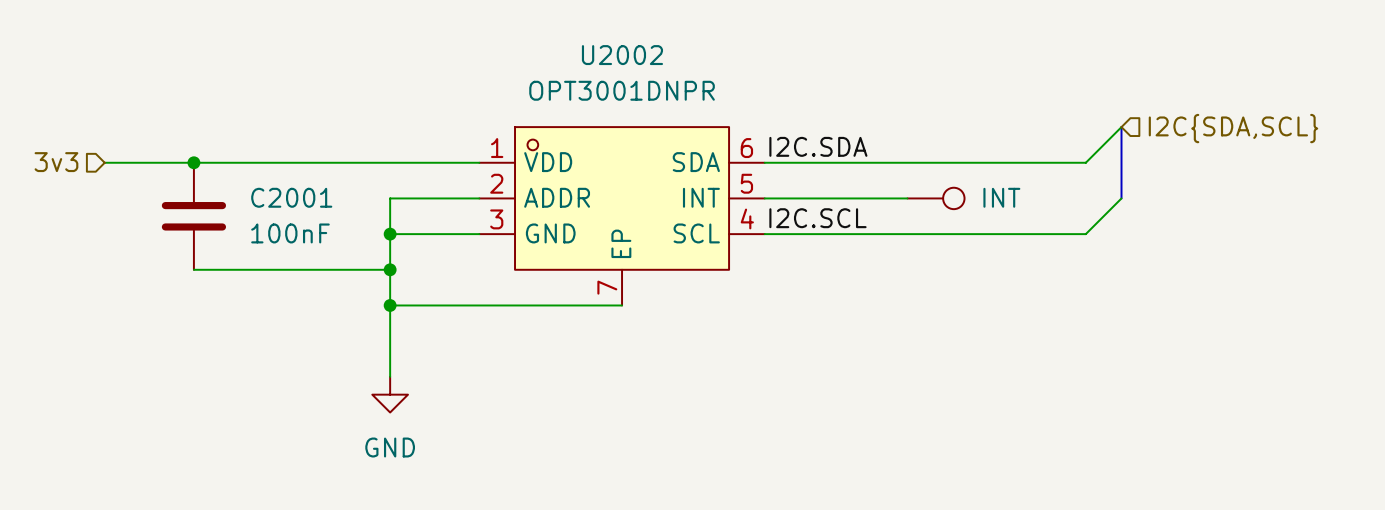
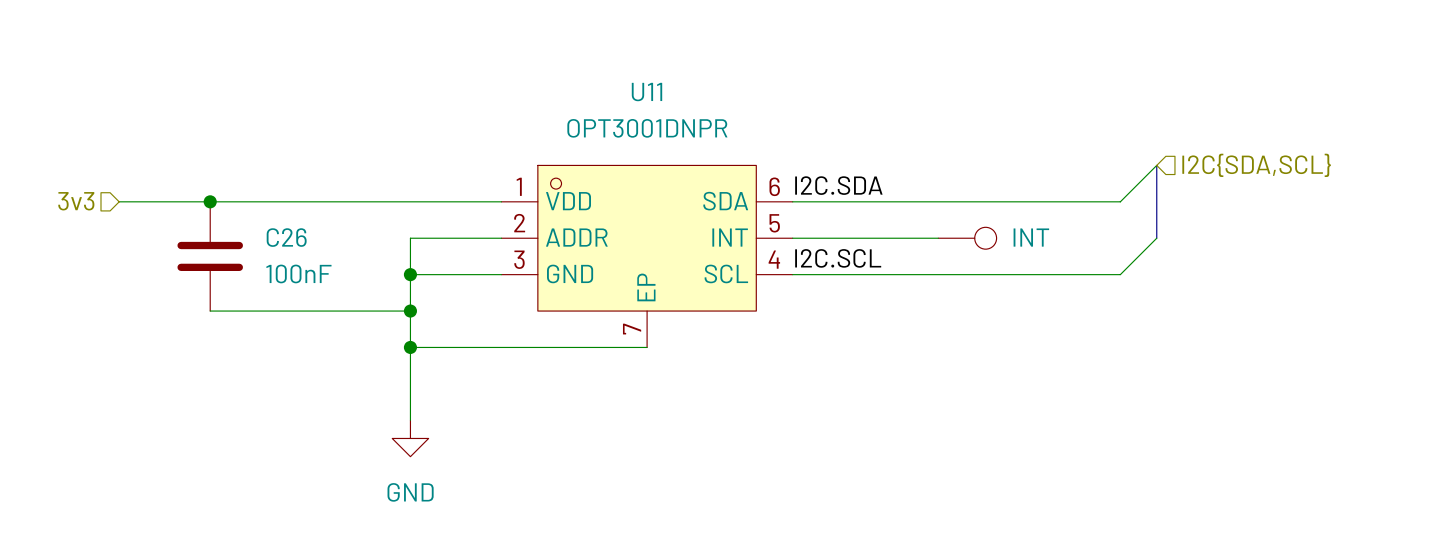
U2002 name: U2002 (622, 55) -> U11 (646, 92)
C2001 name: C2001 (291, 197) -> C26 (286, 237)

